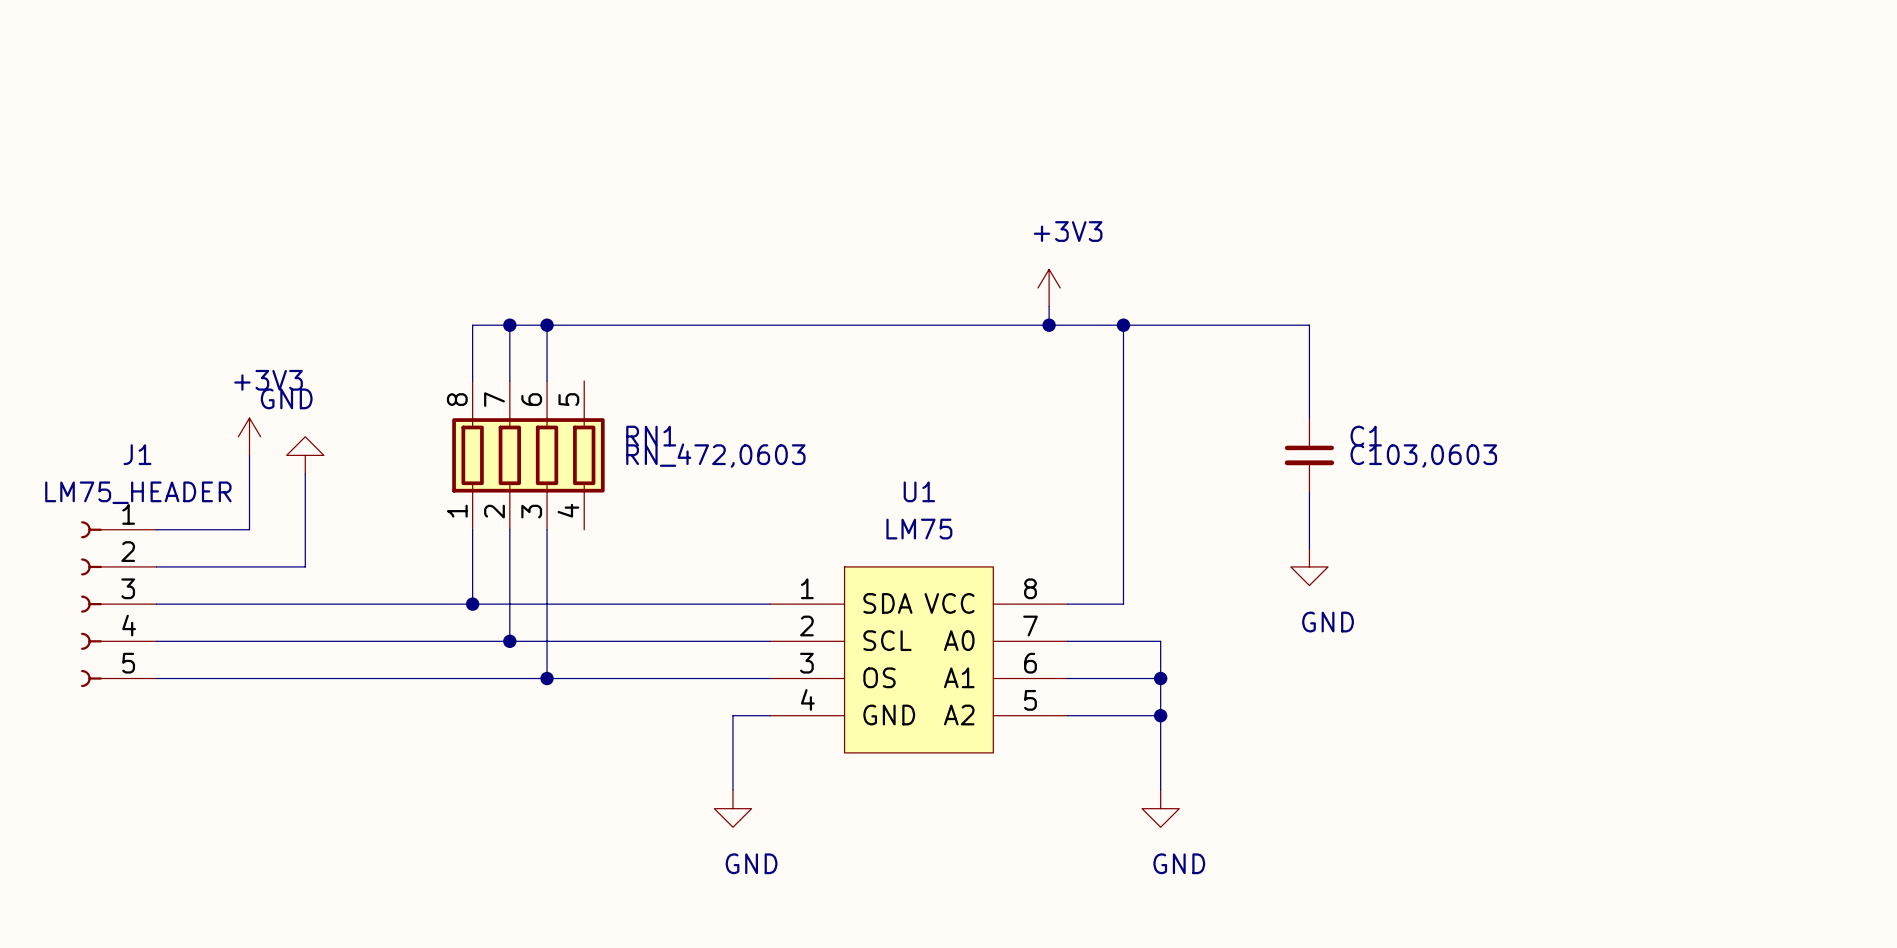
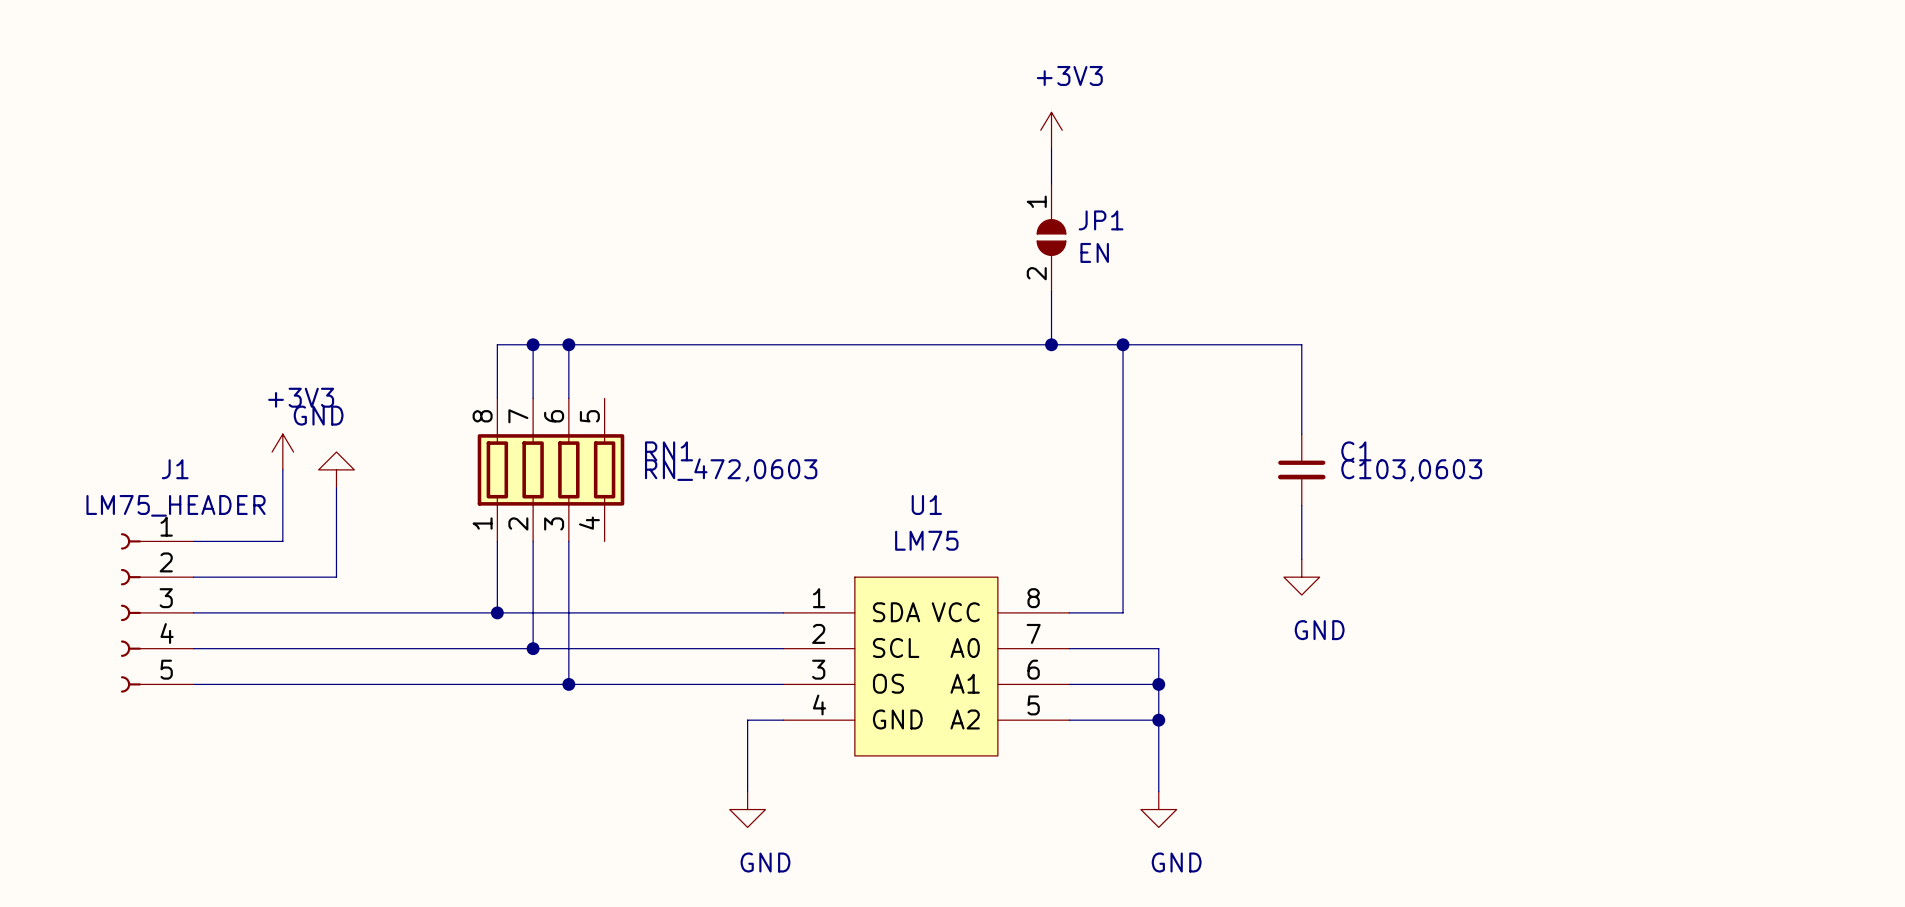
wire: none -> (1051, 148) (1051, 183)
JP1: none -> EN (1051, 237)
power symbol position: +3V3 (1049, 288) -> +3V3 (1051, 130)

